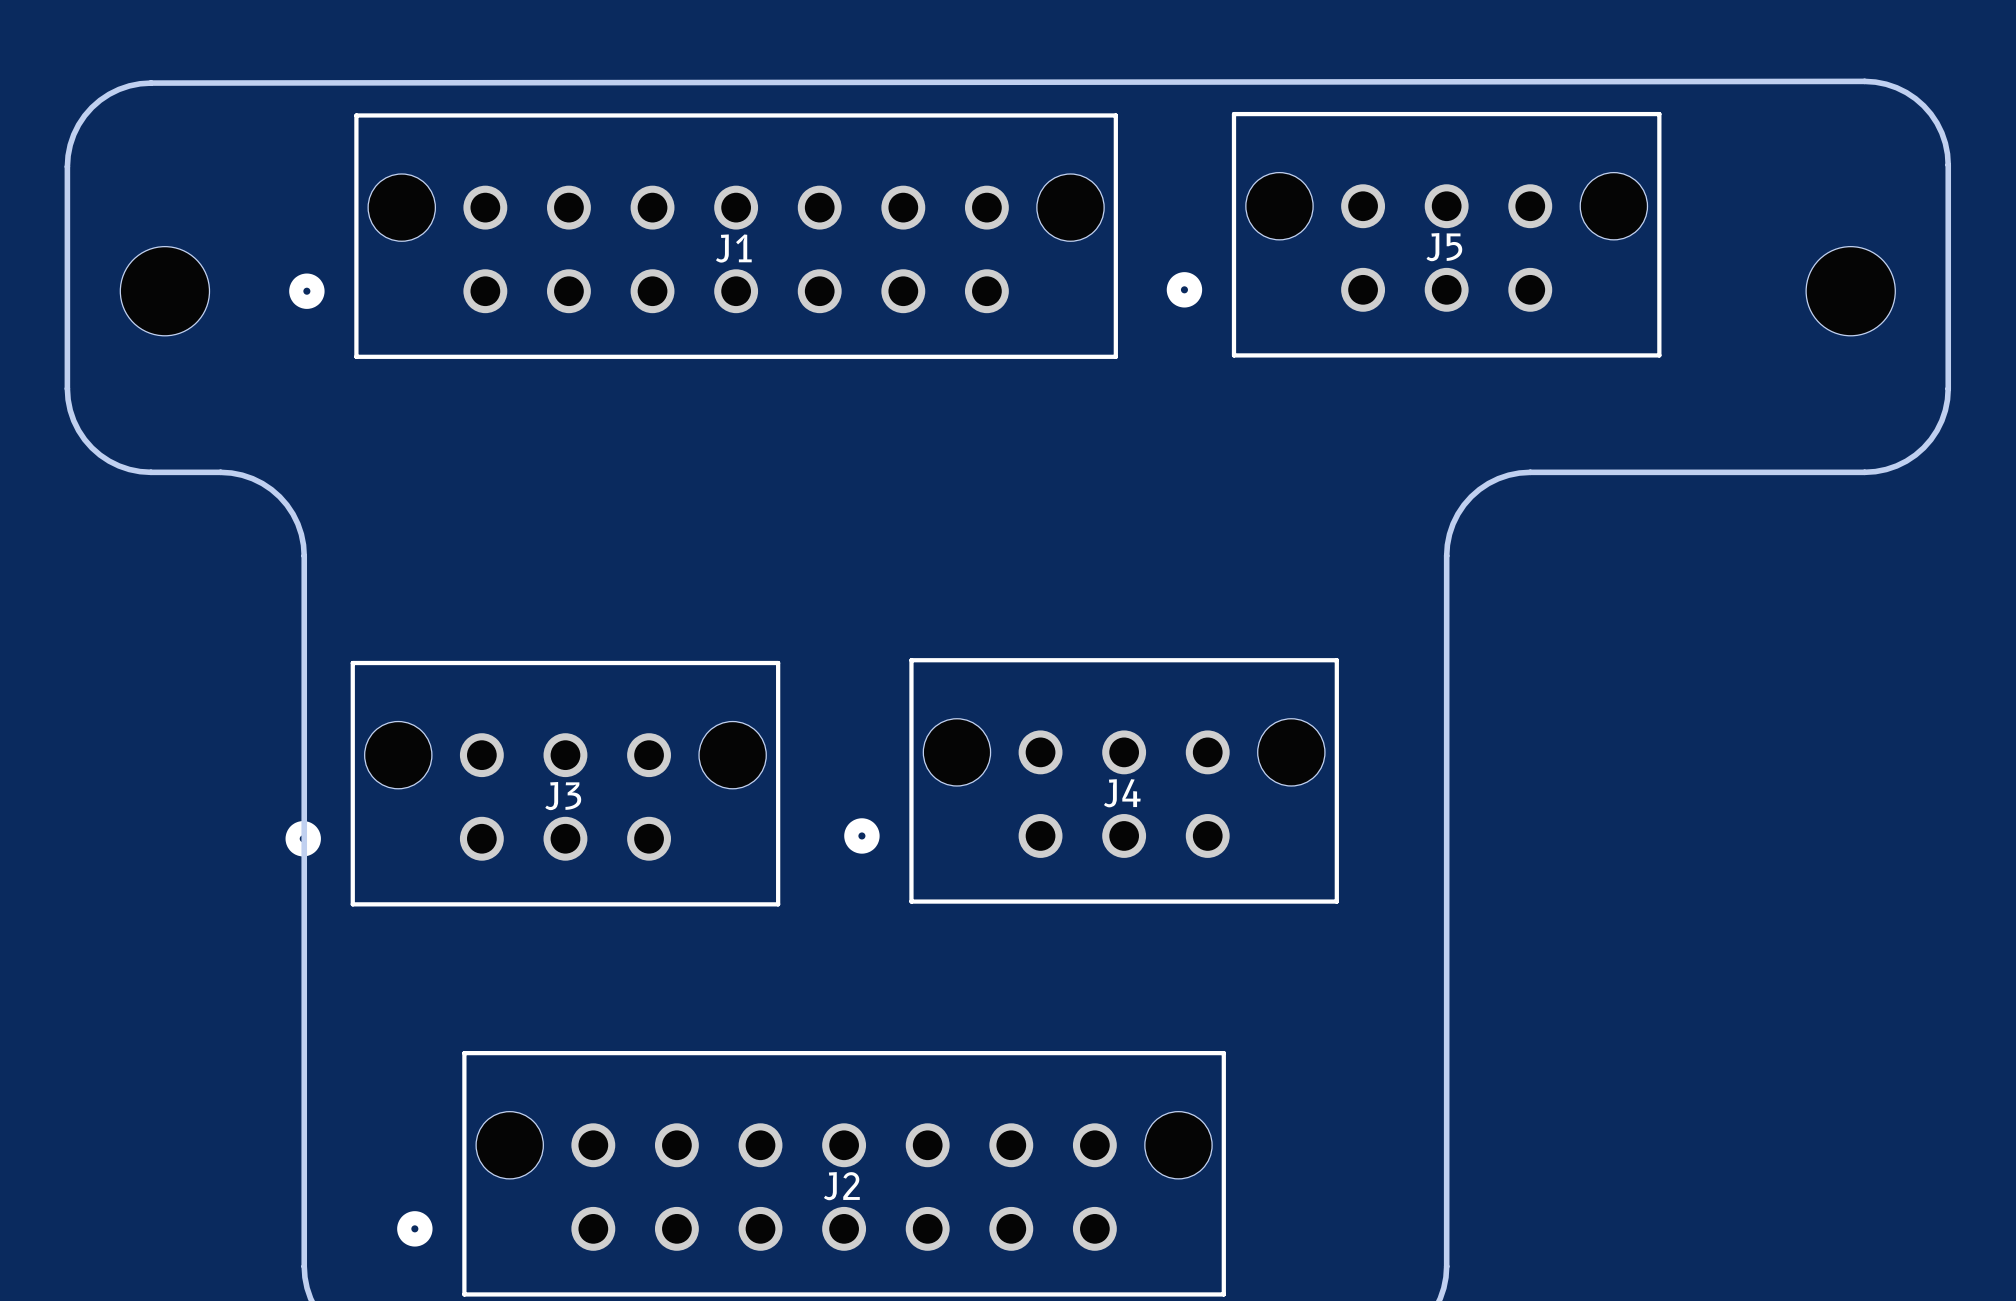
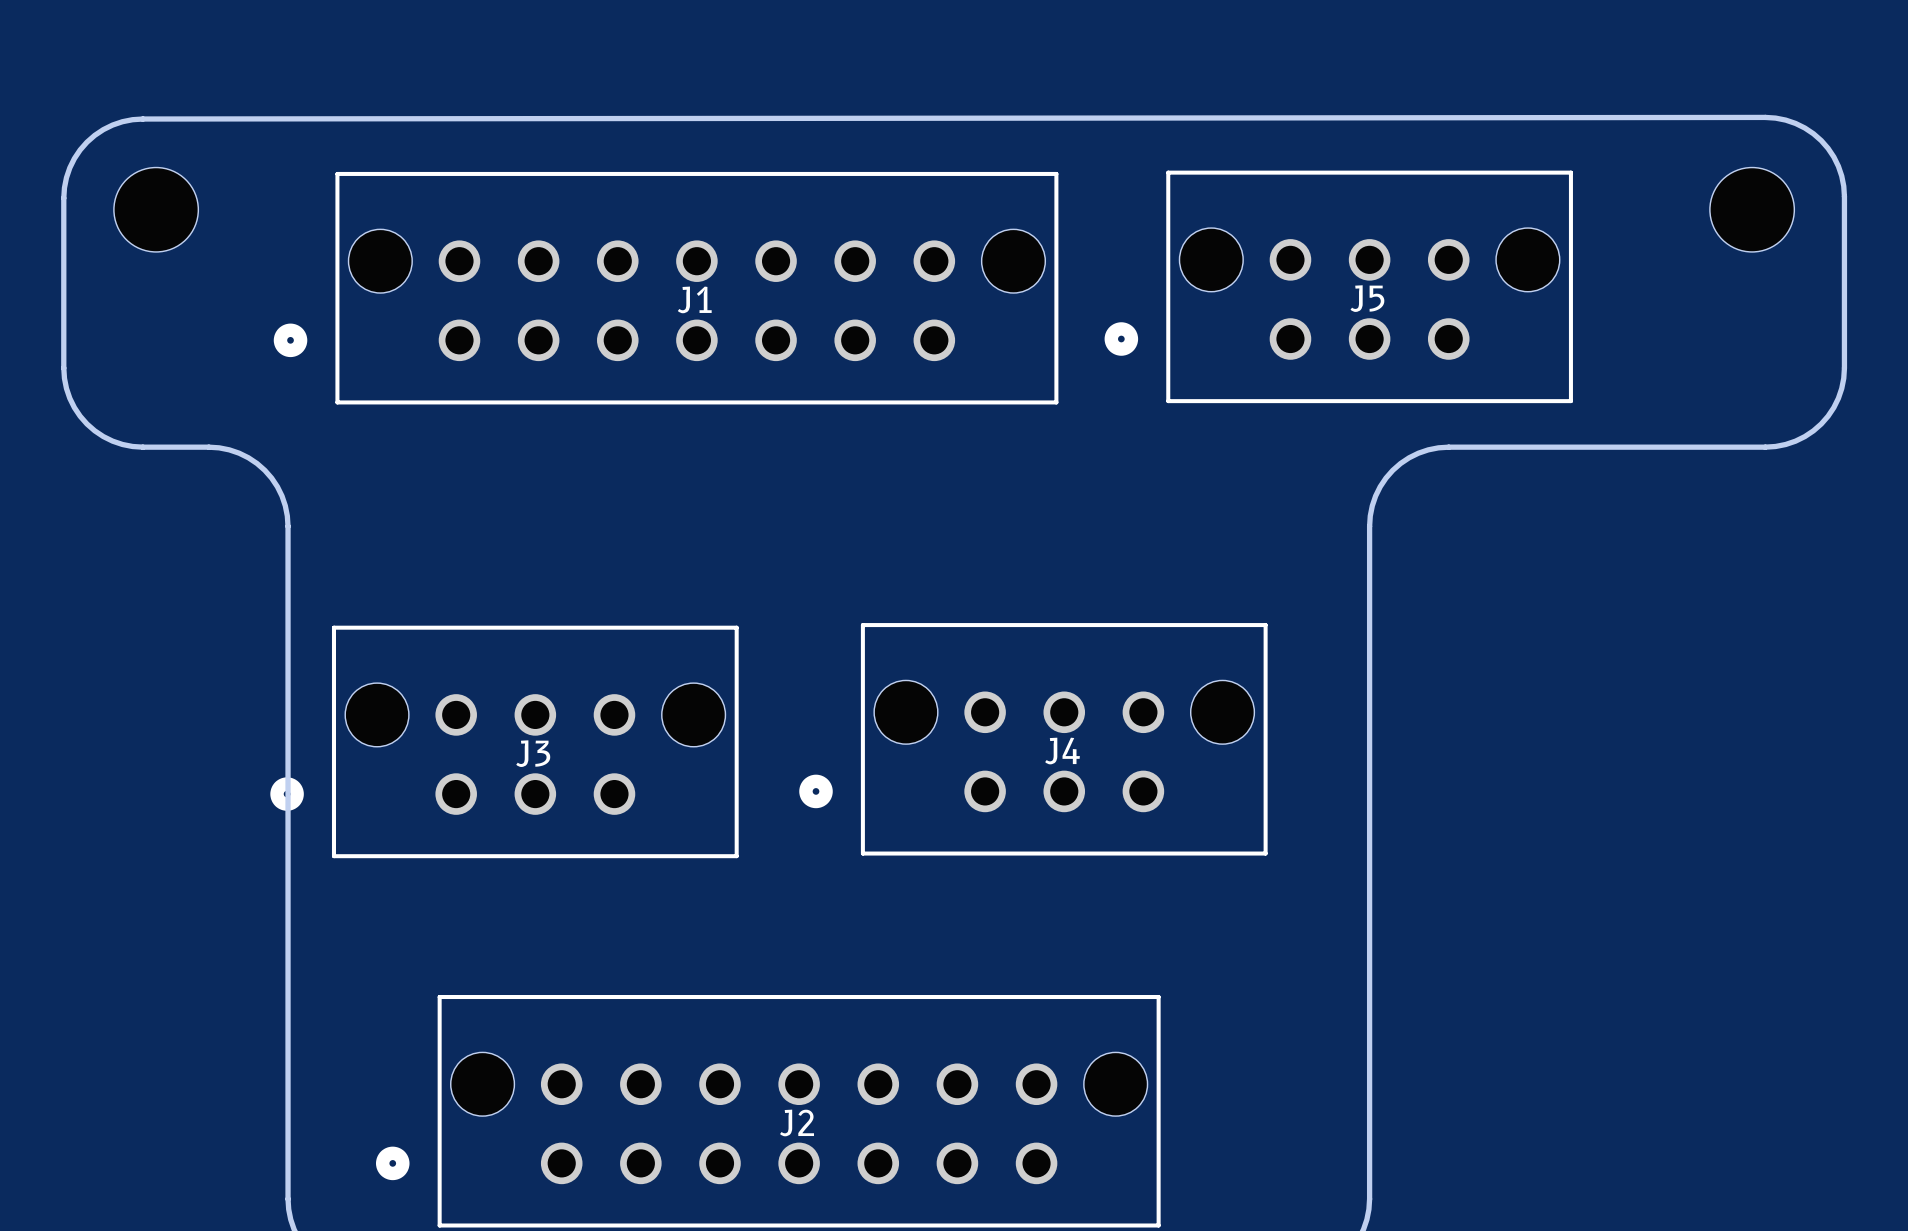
board edge: (1948, 207) (1947, 154) (1937, 123) (1923, 105) (1906, 92) (1886, 84) (1864, 81) (140, 83) (118, 89) (100, 100) (78, 124) (68, 155) (67, 209) -> (1844, 196) (1838, 166) (1821, 140) (1795, 123) (1765, 117) (142, 119) (112, 125) (86, 142) (69, 167) (63, 198)
J5 position: (1414, 234) -> (1338, 286)
J1 position: (703, 236) -> (666, 288)
part position: (164, 291) -> (156, 209)
part position: (1850, 291) -> (1752, 209)

